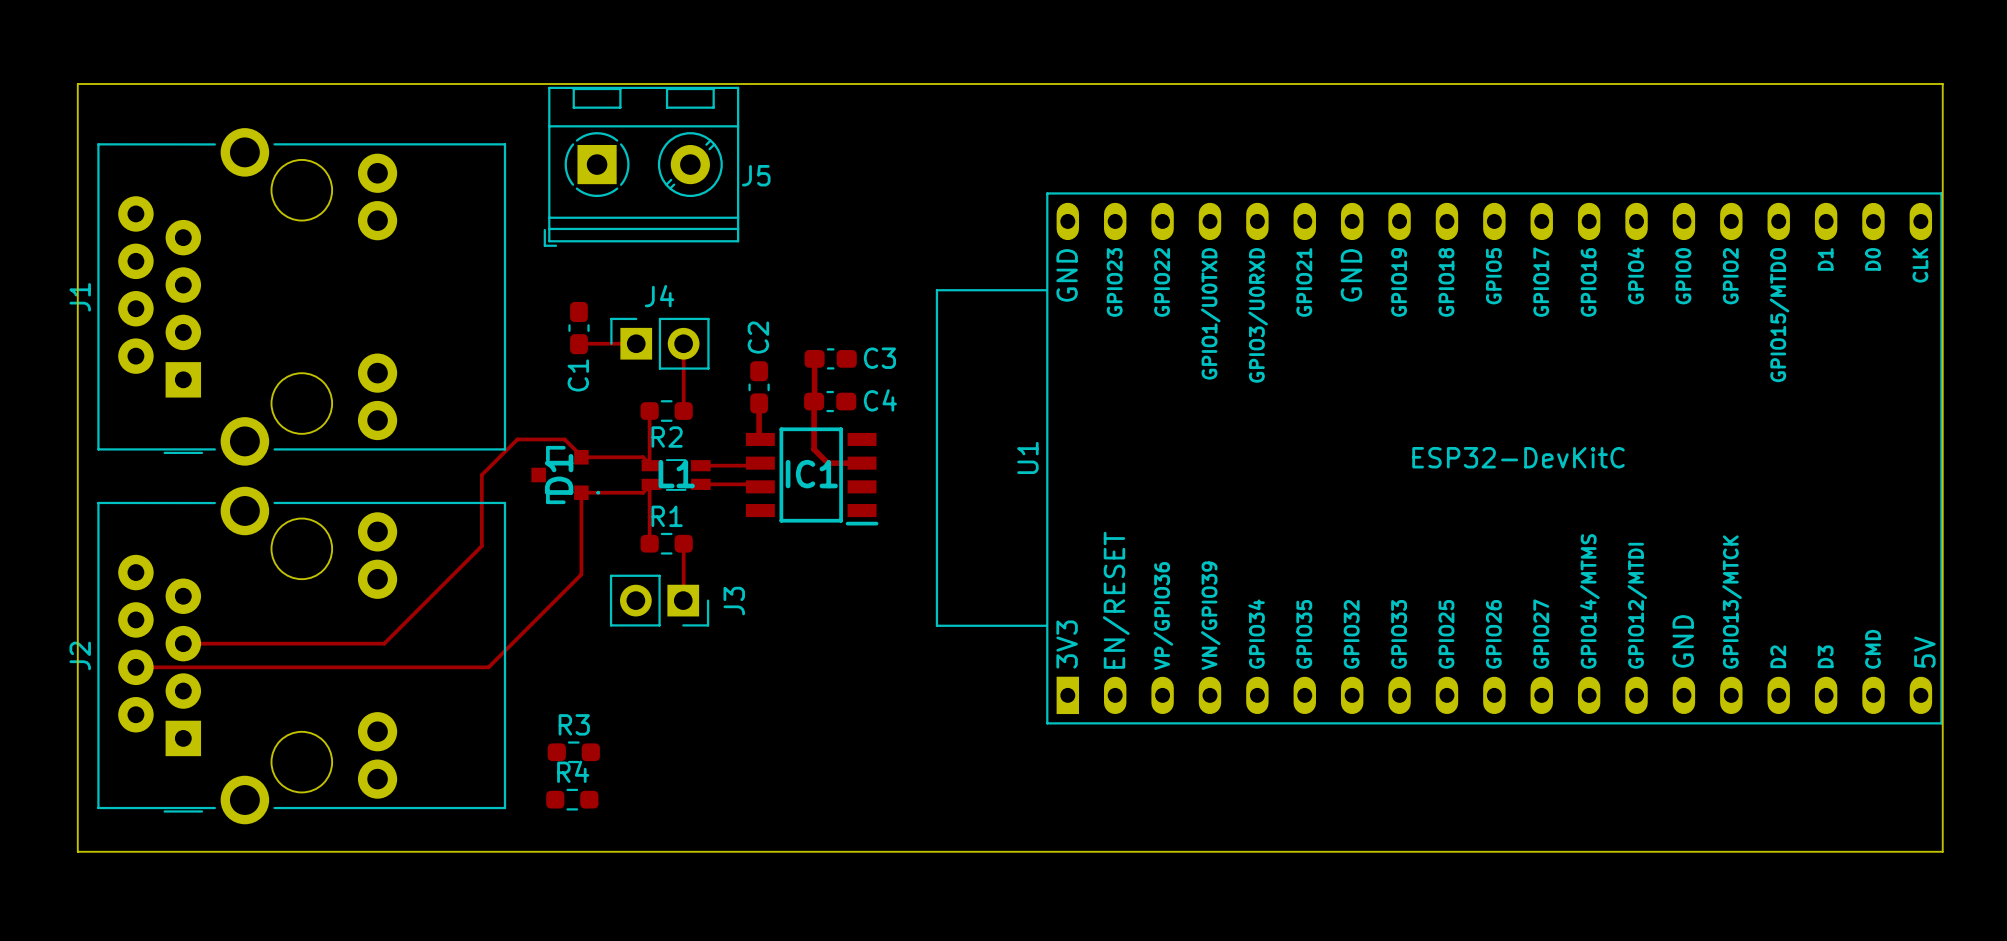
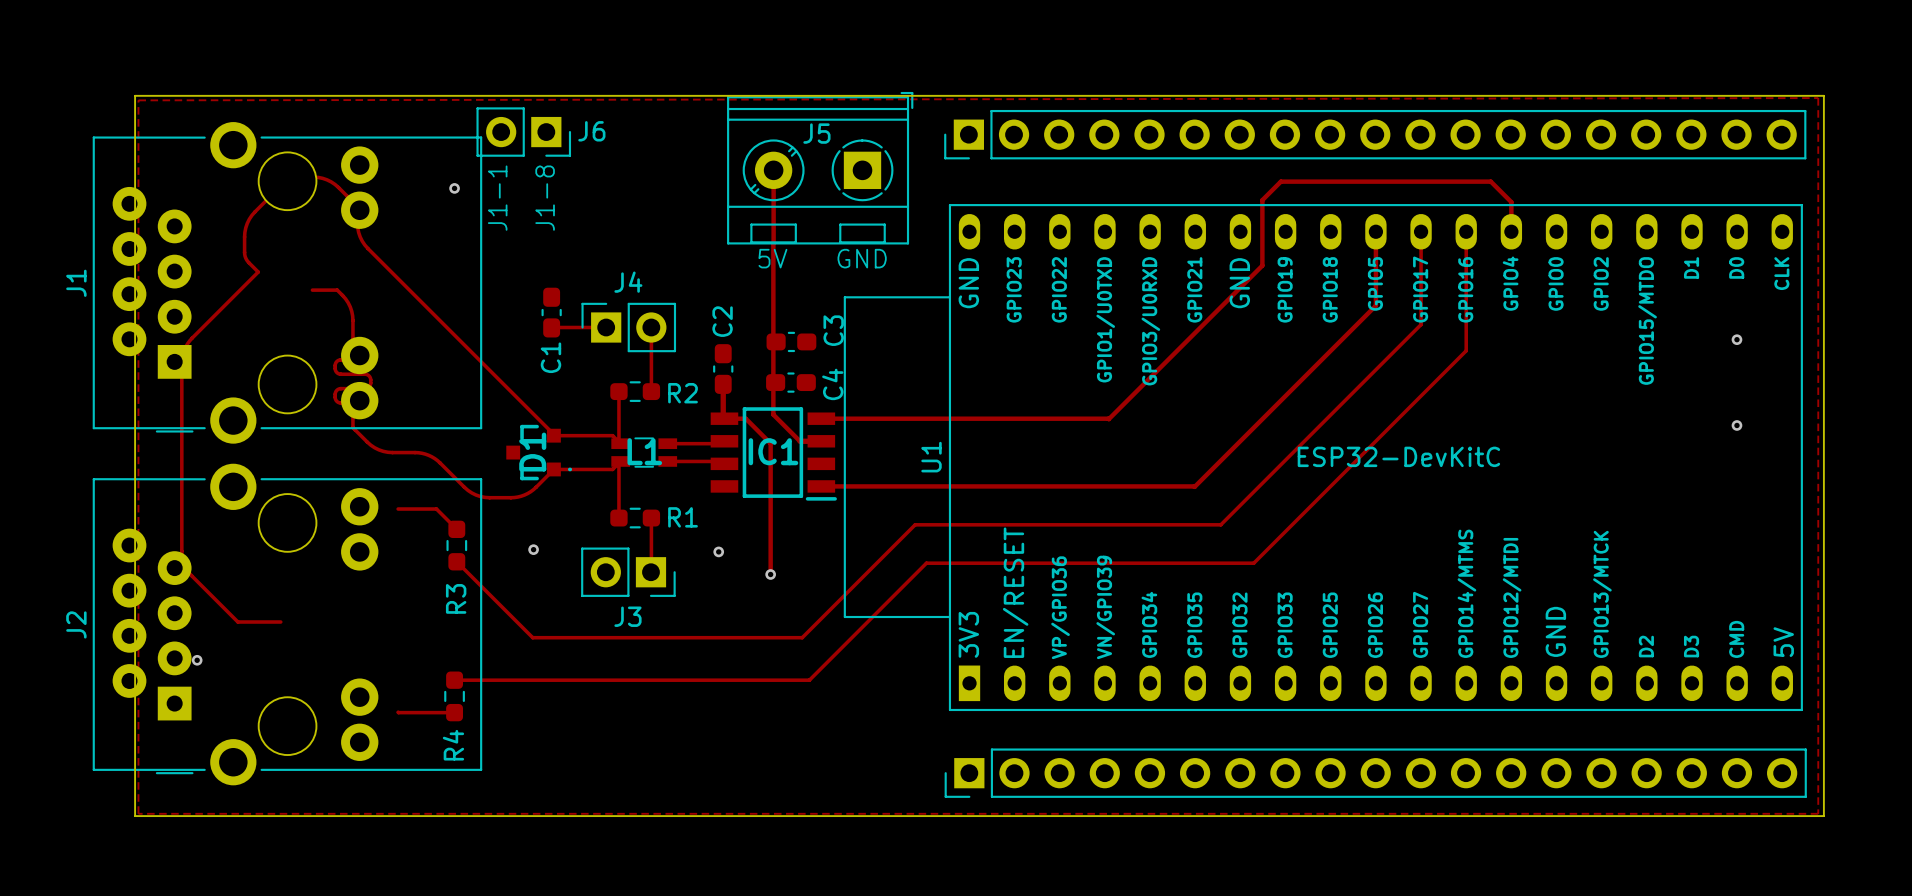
board edge: (77, 84) (1942, 84) (1942, 851) (77, 851) (77, 84) -> (135, 95) (135, 816) (1823, 816) (1823, 95) (135, 95)
zone outline: none -> (1818, 98) (138, 100) (138, 813) (1818, 813) (1818, 98)
J6: none -> (523, 132)
part: none -> (1375, 134)
J5 rotation: 0° (641, 166) -> 180° (820, 168)
J5 position: (641, 166) -> (820, 168)
J5 name position: J5 (756, 175) -> J5 (816, 133)
track: none -> (773, 170) (773, 243)
U1 footprint: [935, 192, 1943, 725] -> [843, 204, 1803, 712]
via: none -> (454, 188)
text: none -> J1-1 (497, 198)
text: none -> J1-8 (545, 198)
track: none -> (1375, 231) (1375, 305) (1194, 486) (821, 486)
track: none -> (1421, 231) (1421, 324) (1220, 524) (915, 524) (802, 637) (532, 637) (456, 561)
track: none -> (1466, 231) (1466, 350) (1253, 563) (926, 563) (809, 680) (454, 680)
track: none -> (1511, 231) (1511, 202) (1490, 181) (1280, 181) (1262, 200) (1262, 265) (1108, 419) (821, 418)
text: none -> 5V (772, 258)
text: none -> GND (862, 258)
text: none -> GPIO4 (1510, 283)
text: none -> GPIO5 (1375, 283)
text: none -> GPIO17 (1420, 289)
text: none -> GPIO23 (1014, 289)
text: none -> GPIO22 (1059, 289)
text: none -> GPIO21 (1194, 289)
text: none -> GPIO19 (1285, 289)
text: none -> GPIO18 (1330, 289)
text: none -> GPIO16 (1465, 289)
text: none -> GPIO1/U0TXD (1105, 319)
text: none -> GPIO15/MTDO (1647, 320)
text: none -> GPIO3/U0RXD (1150, 321)
via: none -> (1736, 339)
track: (814, 358) (814, 449) (827, 463) (839, 463) -> (773, 243) (773, 414) (800, 441)
C3 name rotation: 0° (879, 358) -> 90° counterclockwise (833, 330)
C4 name rotation: 0° (880, 400) -> 90° counterclockwise (832, 384)
R2 name position: R2 (667, 437) -> R2 (683, 393)
track: (564, 439) (517, 439) (481, 475) (481, 546) (384, 643) (183, 643) -> (538, 418) (364, 245) (358, 232) (354, 207) (338, 187) (327, 179) (313, 177) (294, 178) (281, 185) (251, 215) (245, 227) (245, 256) (258, 272) (189, 340) (183, 352) (181, 363) (181, 551) (184, 564) (192, 576) (237, 622) (280, 622)
track: none -> (724, 418) (745, 418) (770, 443) (770, 574)
via: none -> (1736, 425)
track: (581, 492) (581, 574) (488, 667) (135, 667) -> (553, 469) (533, 489) (524, 495) (514, 497) (484, 497) (467, 490) (437, 460) (428, 455) (418, 452) (387, 452) (370, 445) (352, 427) (351, 405) (338, 402) (335, 397) (335, 391) (339, 388) (365, 388) (369, 386) (370, 379) (368, 375) (339, 373) (335, 370) (335, 365) (339, 359) (367, 359) (370, 355) (370, 349) (367, 346) (357, 345) (353, 342) (351, 311) (342, 295) (337, 290) (312, 290)
R1 name position: R1 (667, 516) -> R1 (683, 517)
track: none -> (398, 509) (436, 509) (456, 529)
via: none -> (533, 549)
via: none -> (718, 551)
J3 name rotation: 0° (734, 601) -> 90° clockwise (627, 616)
J3 name position: J3 (734, 601) -> J3 (627, 616)
via: none -> (770, 574)
text: none -> GPIO14/MTMS (1466, 593)
text: none -> GPIO13/MTCK (1602, 594)
text: none -> GPIO12/MTDI (1512, 597)
text: none -> VP/GPIO36 (1060, 607)
text: none -> VN/GPIO39 (1105, 607)
text: none -> GPIO34 (1149, 624)
text: none -> GPIO27 (1420, 624)
text: none -> GPIO35 (1194, 625)
text: none -> GPIO32 (1239, 625)
text: none -> GPIO33 (1285, 625)
text: none -> GPIO25 (1330, 625)
text: none -> GPIO26 (1375, 625)
text: none -> GND (1555, 631)
text: none -> 3V3 (968, 634)
text: none -> CMD (1736, 639)
text: none -> 5V (1783, 642)
via: none -> (197, 660)
R3 name position: R3 (574, 724) -> R3 (456, 598)
track: none -> (398, 712) (454, 712)
R3 rotation: 0° (573, 752) -> 90° clockwise (456, 545)
R3 position: (573, 752) -> (456, 545)
R4 name position: R4 (573, 771) -> R4 (453, 745)
R4 rotation: 0° (572, 799) -> 90° clockwise (454, 696)
R4 position: (572, 799) -> (454, 696)
part: none -> (1375, 773)

